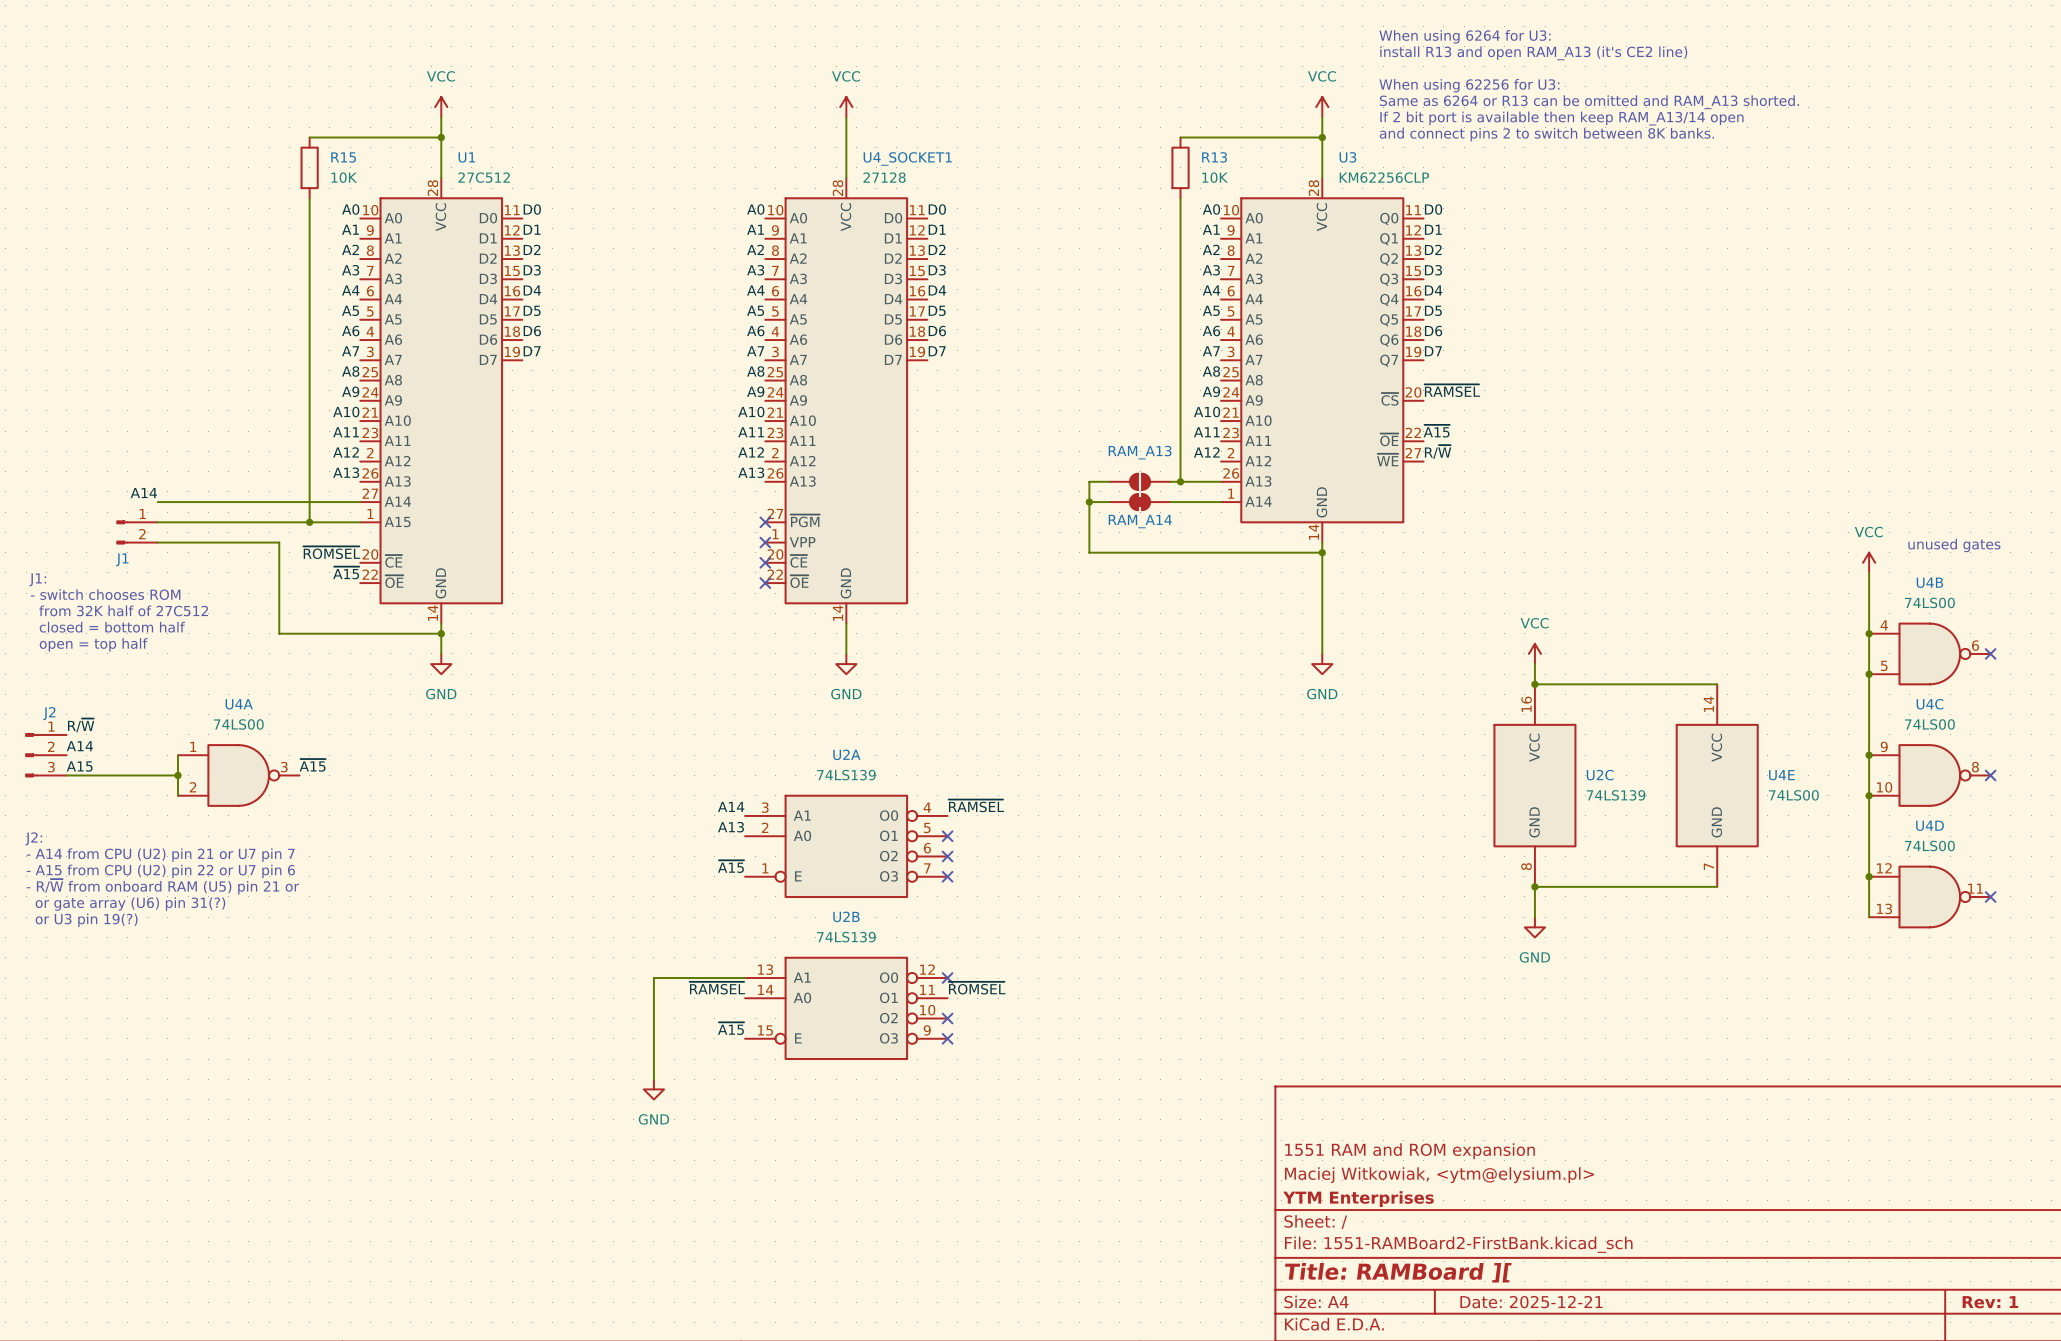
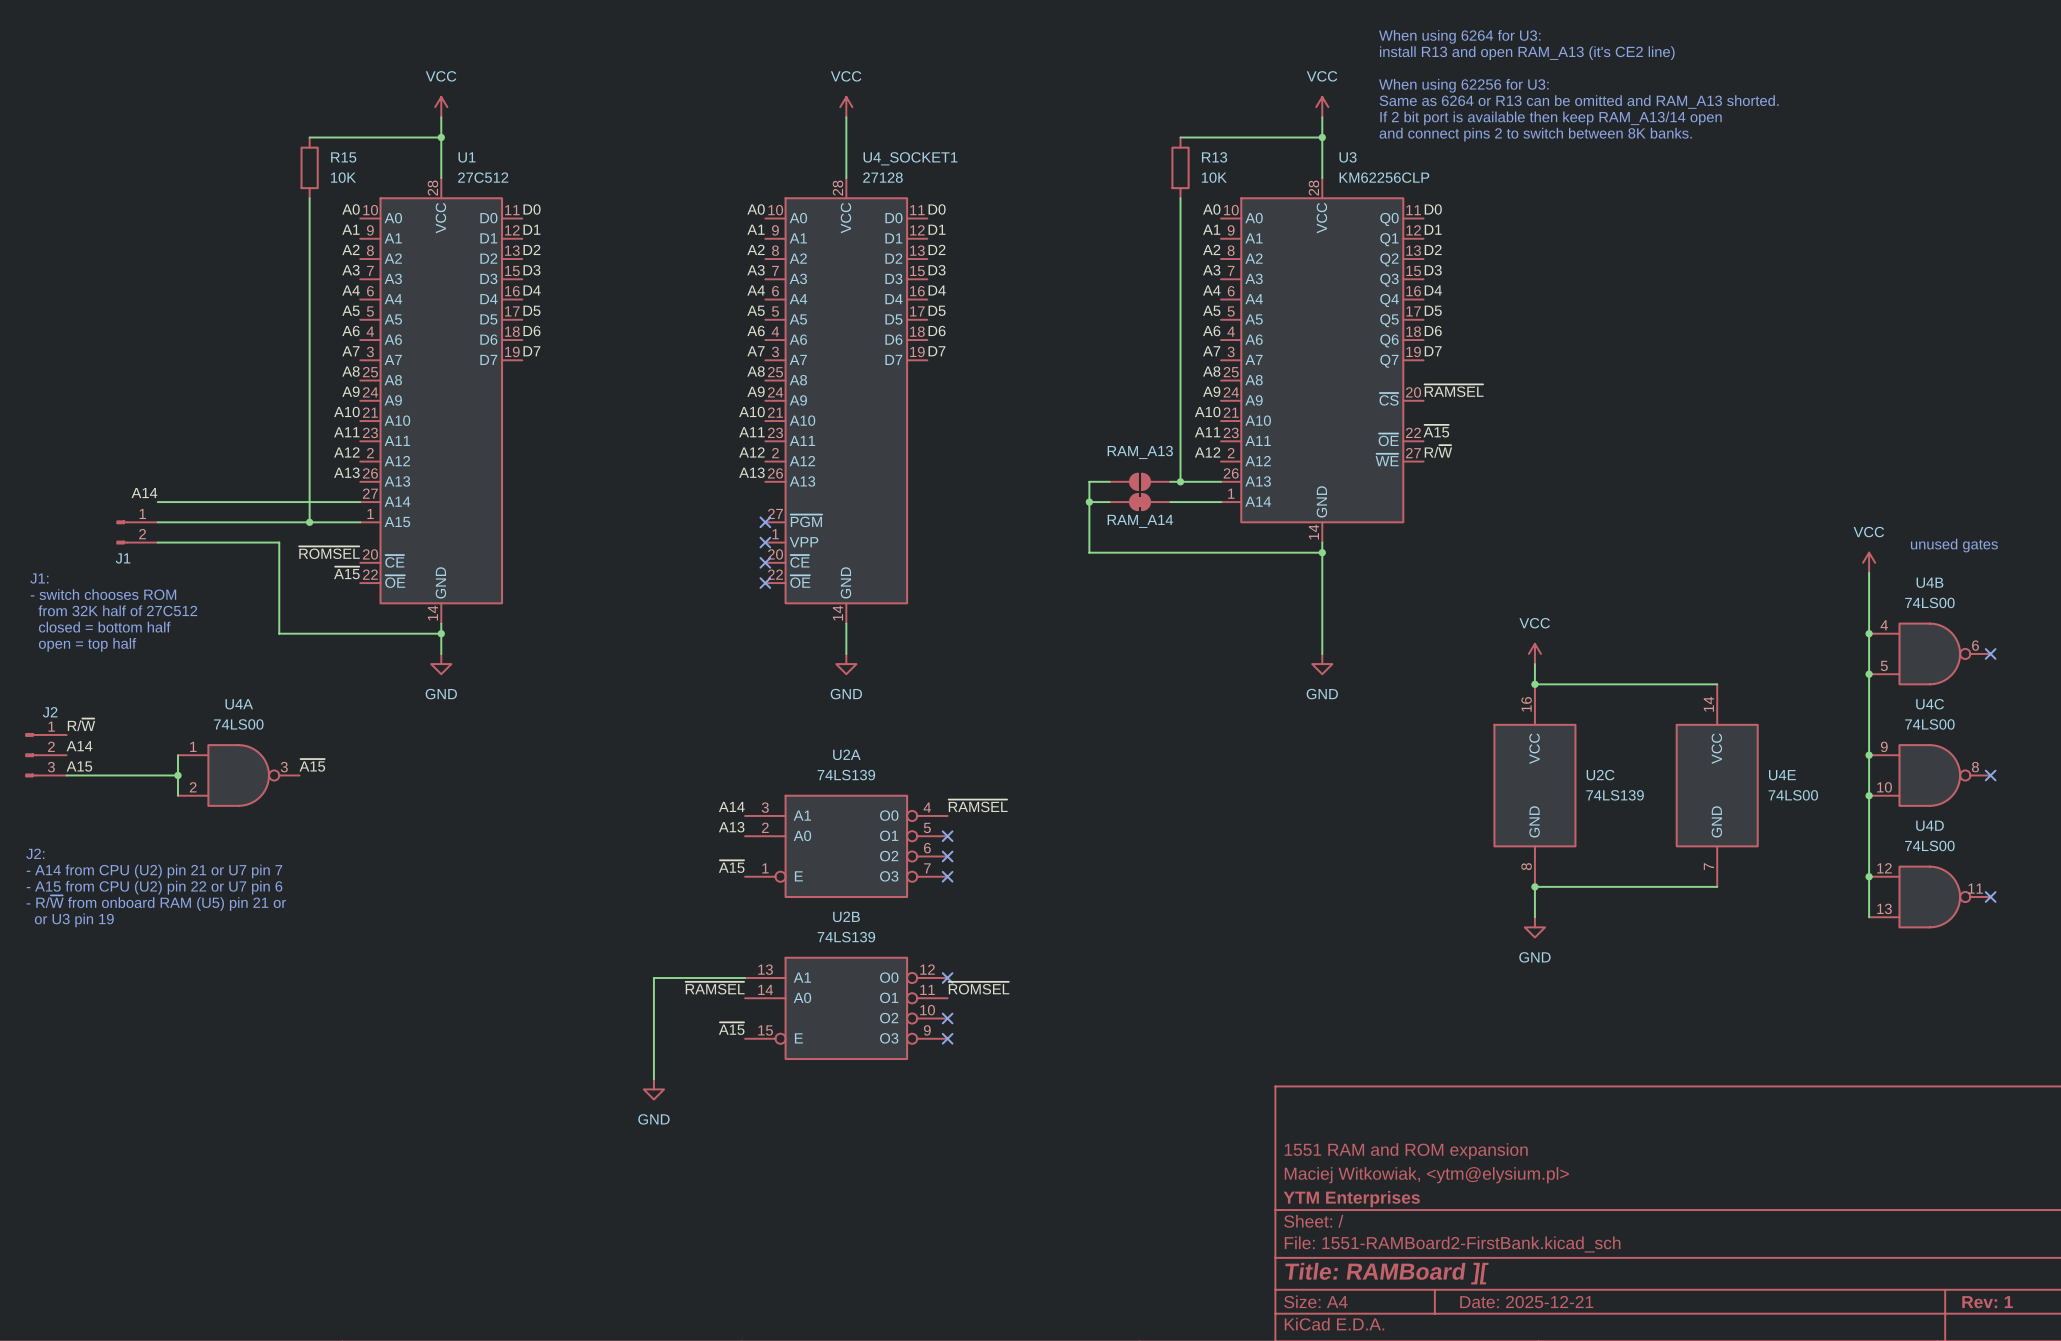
text: J2: (33, 838) -> none
text: - A14 from CPU (U2) pin 21 or U7 pin 7 (160, 855) -> J2: (35, 853)
text: - A15 from CPU (U2) pin 22 or U7 pin 6 (160, 871) -> - A14 from CPU (U2) pin 21 or U7 pin 7 (154, 871)
text: - R/~{W} from onboard RAM (U5) pin 21 or (162, 886) -> - A15 from CPU (U2) pin 22 or U7 pin 6 (154, 887)
text: or gate array (U6) pin 31(?) (130, 904) -> - R/~{W} from onboard RAM (U5) pin 21 or (156, 903)
text: or U3 pin 19(?) (86, 920) -> or U3 pin 19 (74, 920)

